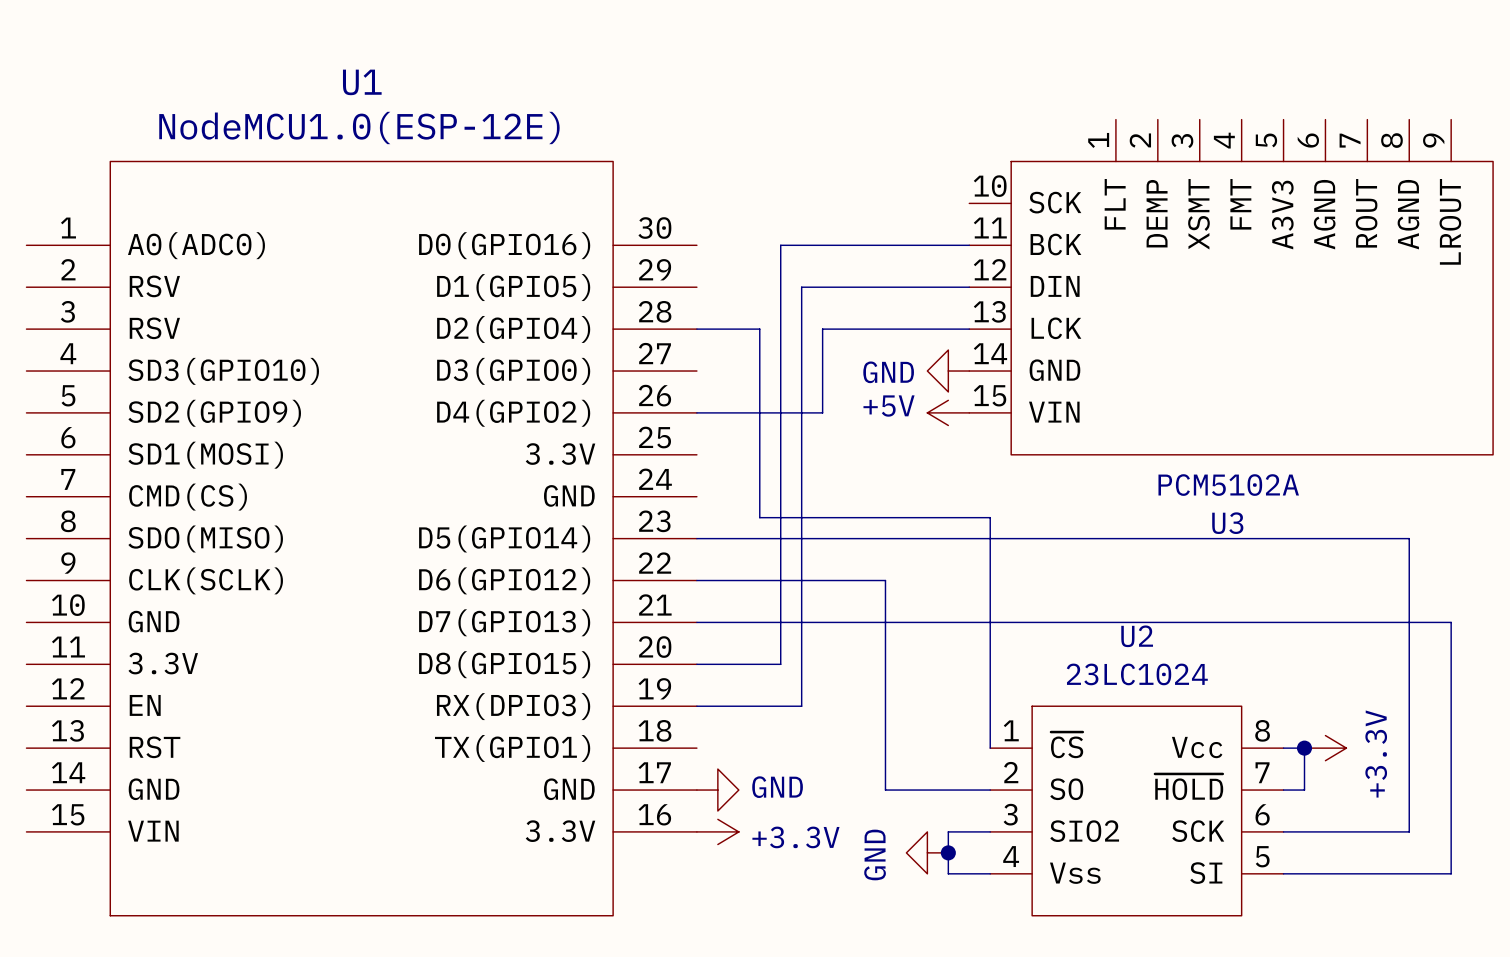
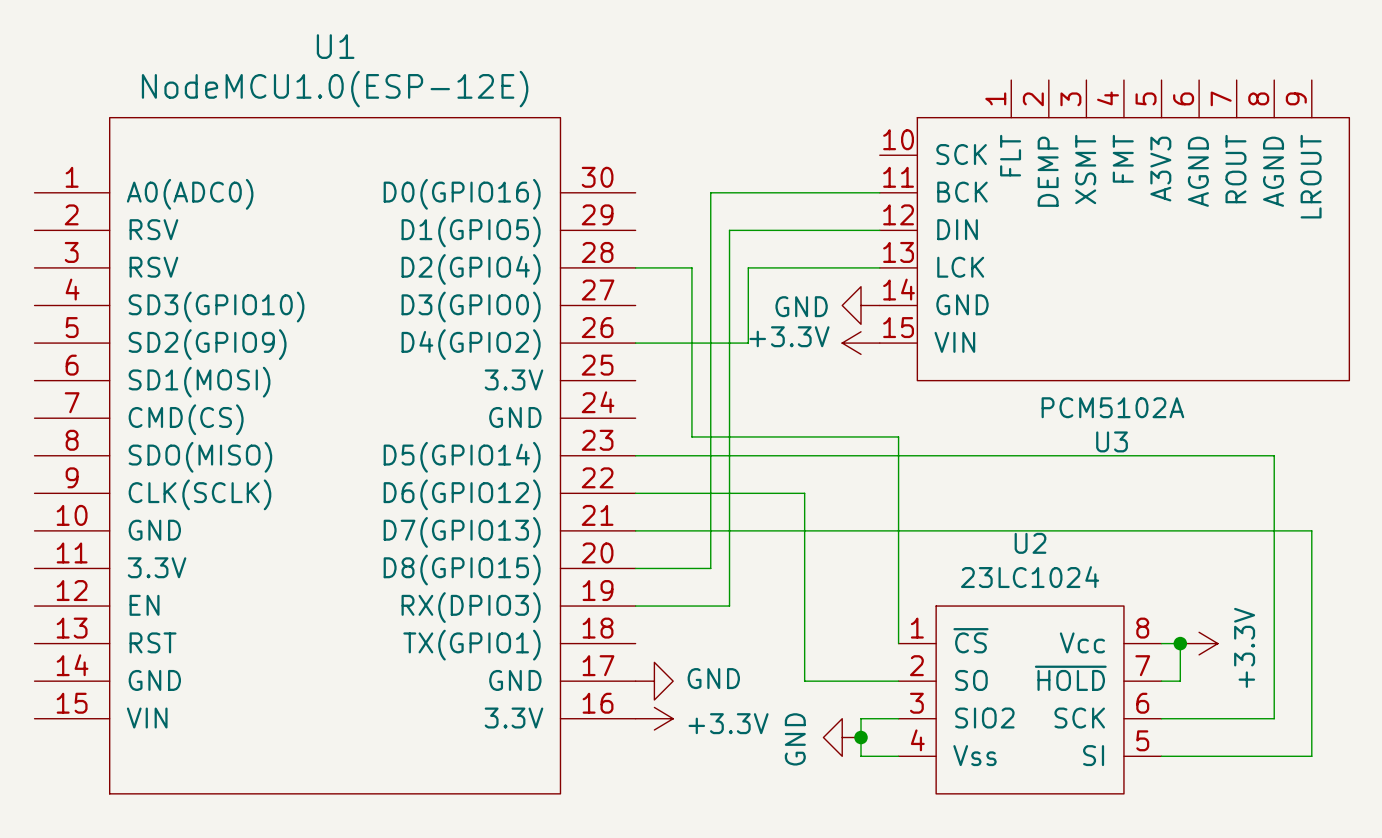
power symbol: +5V (948, 412) -> +3.3V (861, 343)

